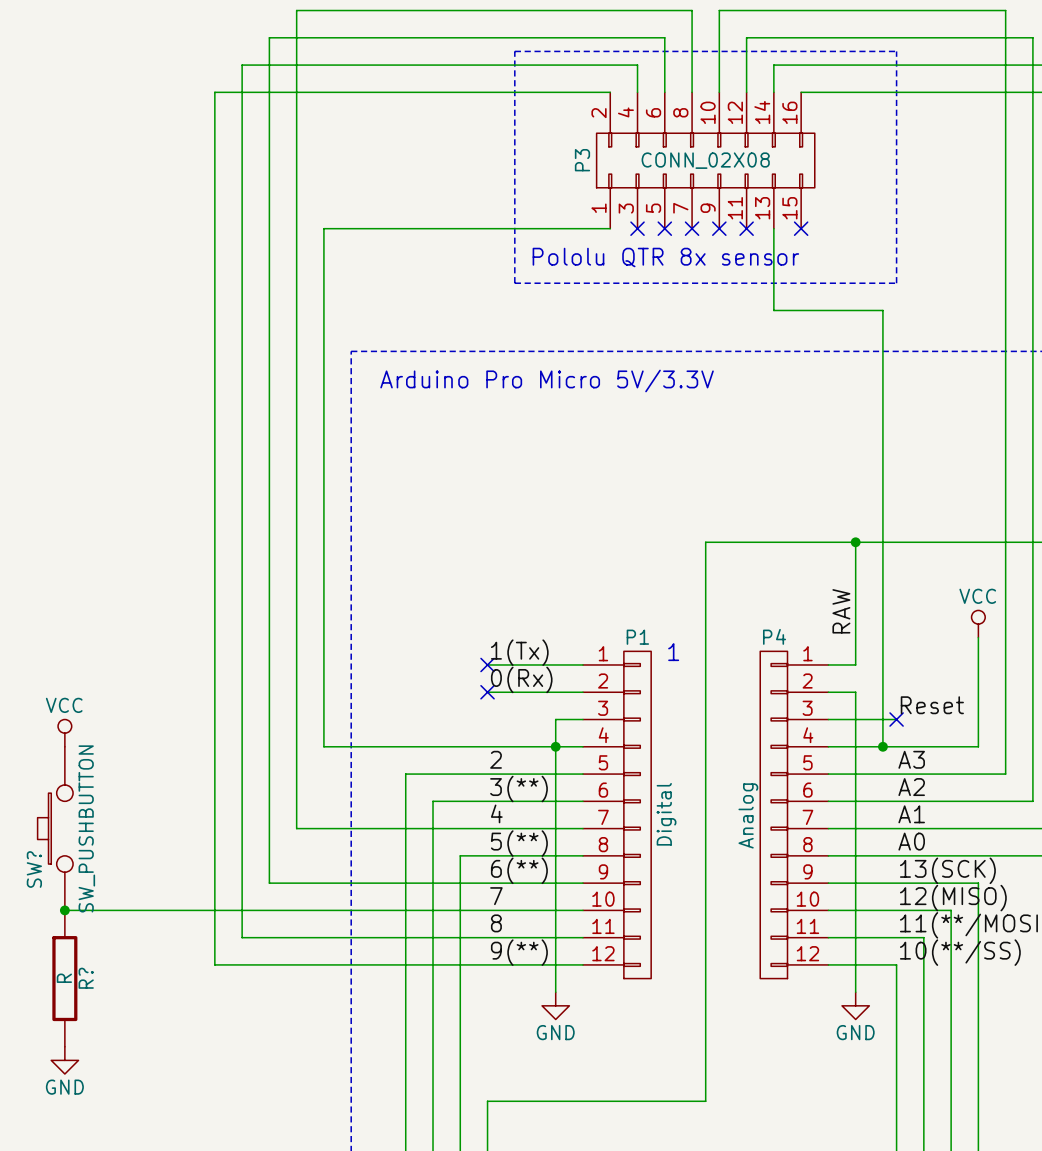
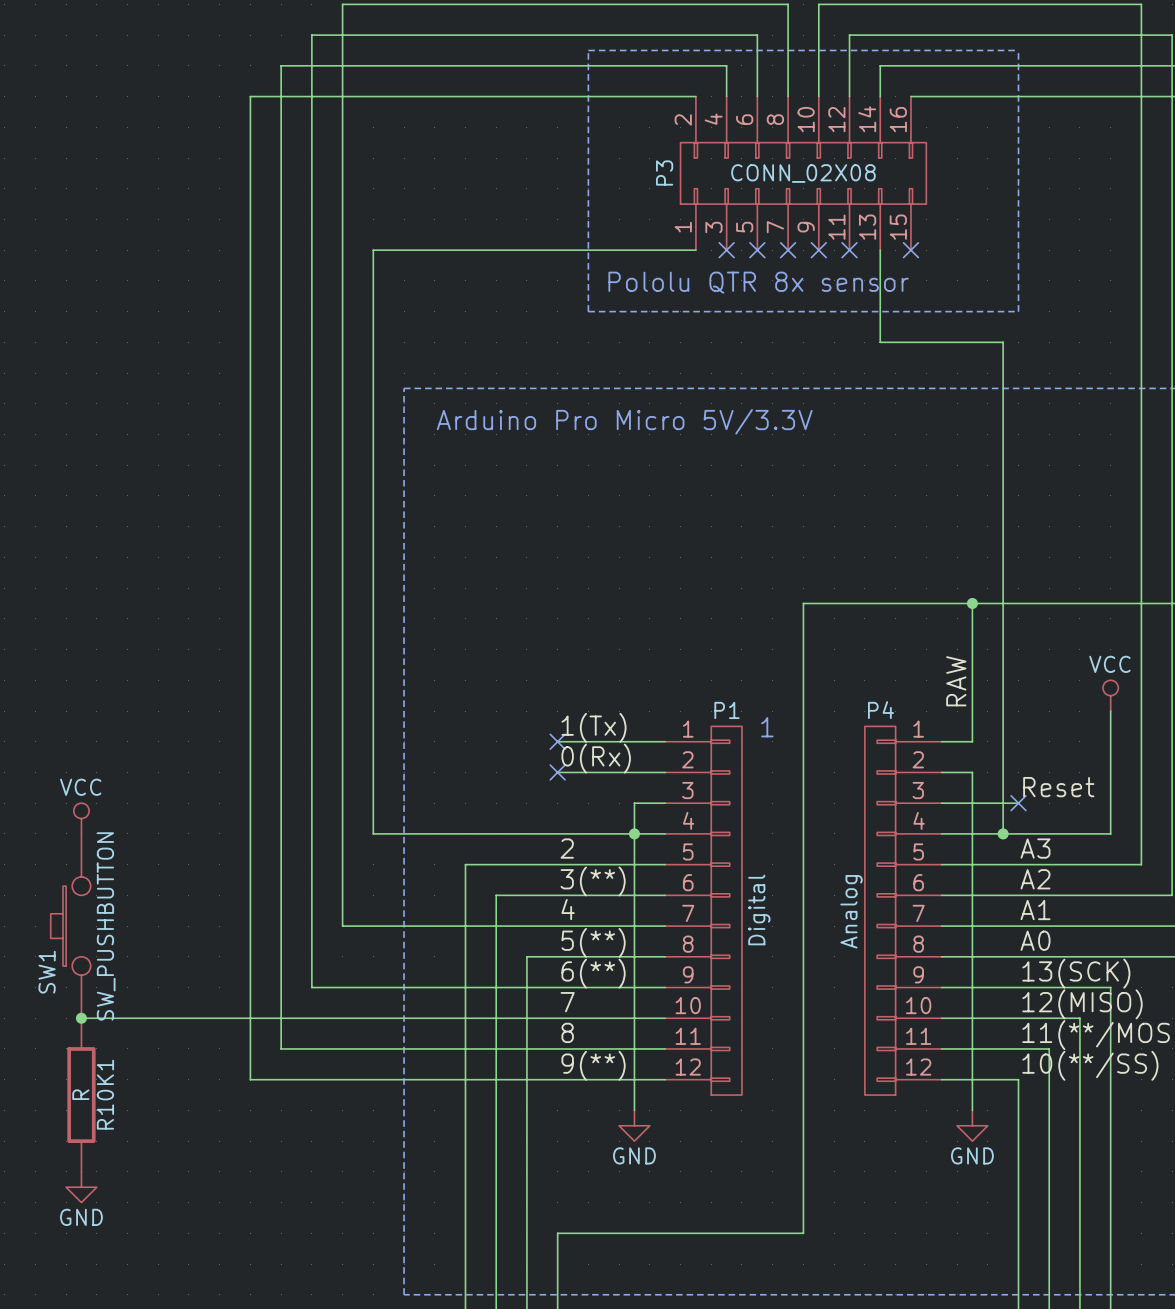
SW? name: SW? (34, 869) -> SW1 (47, 972)
R? name: R? (86, 978) -> R10K1 (105, 1094)

